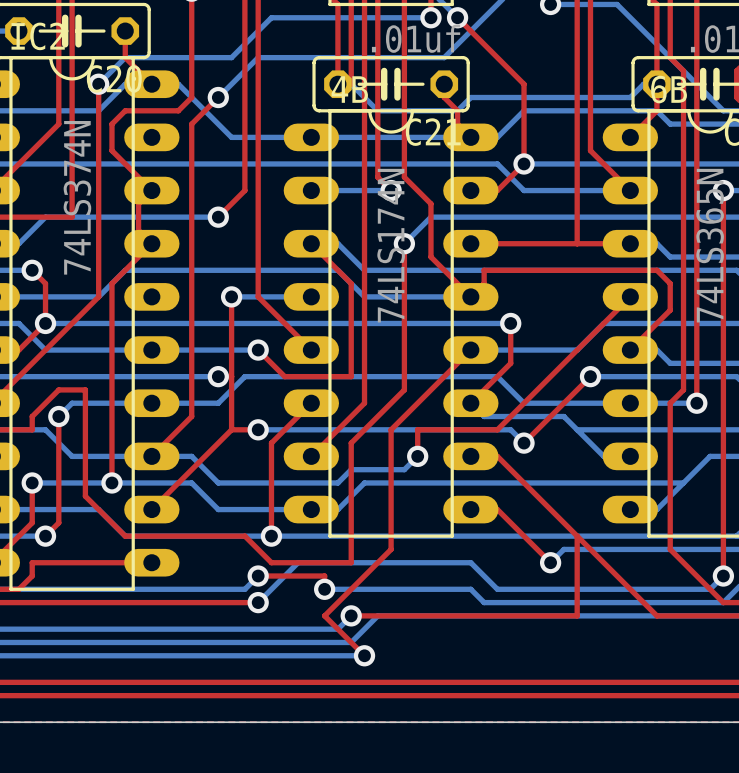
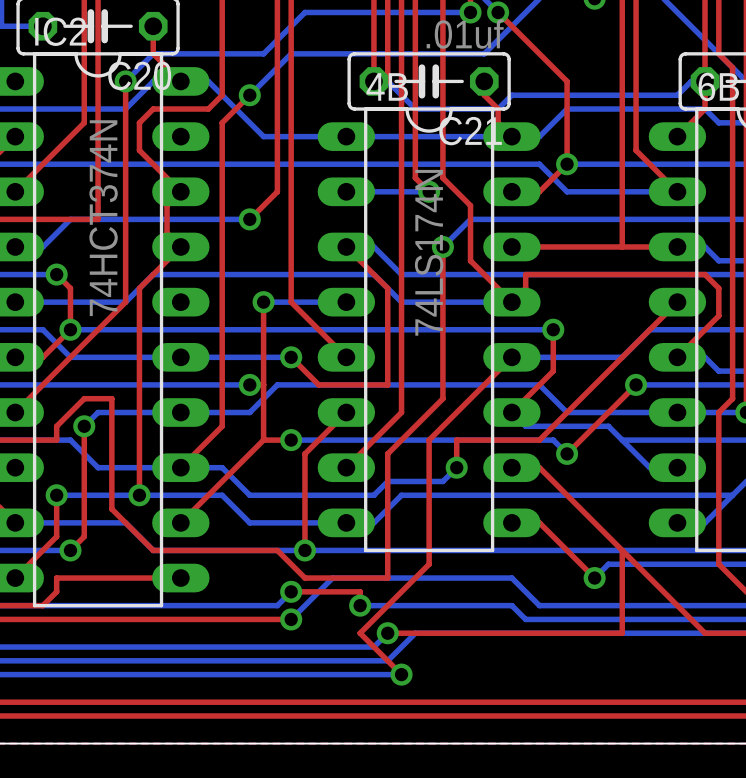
IC2 value: 74LS374N (77, 197) -> 74HCT374N (103, 218)

